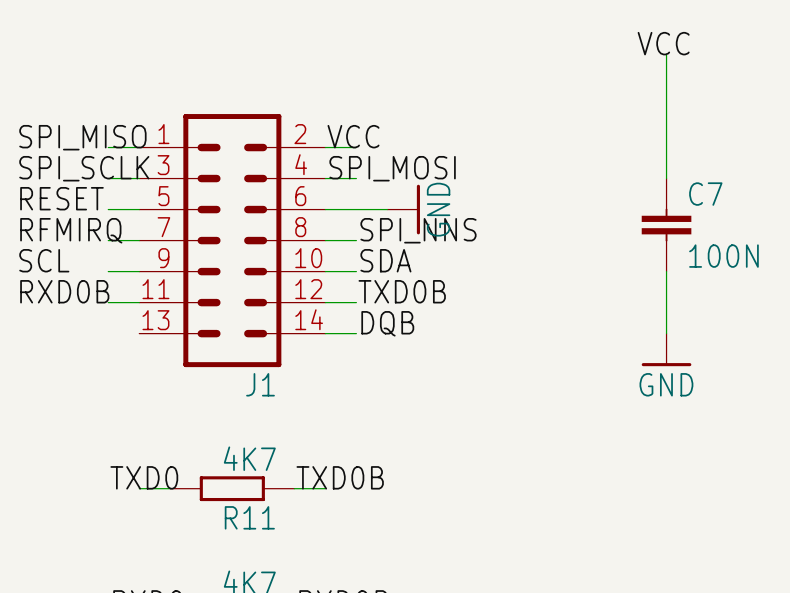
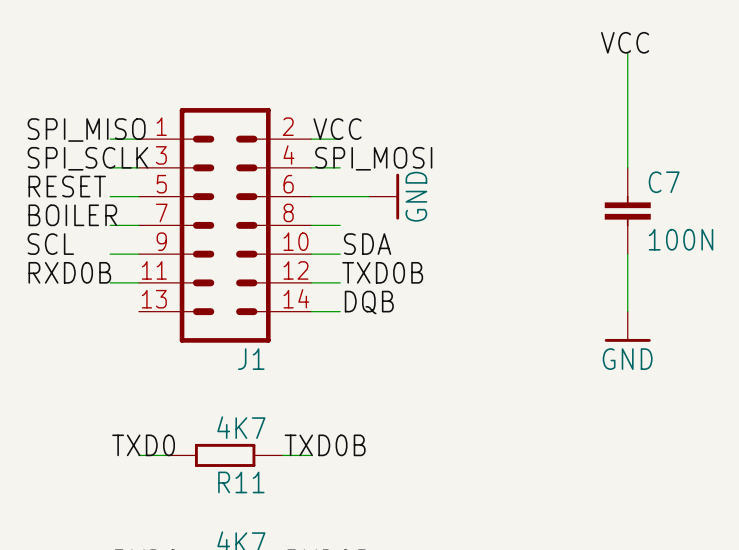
label: RFMIRQ (71, 230) -> BOILER (72, 215)
label: SPI_NNS (418, 230) -> none

